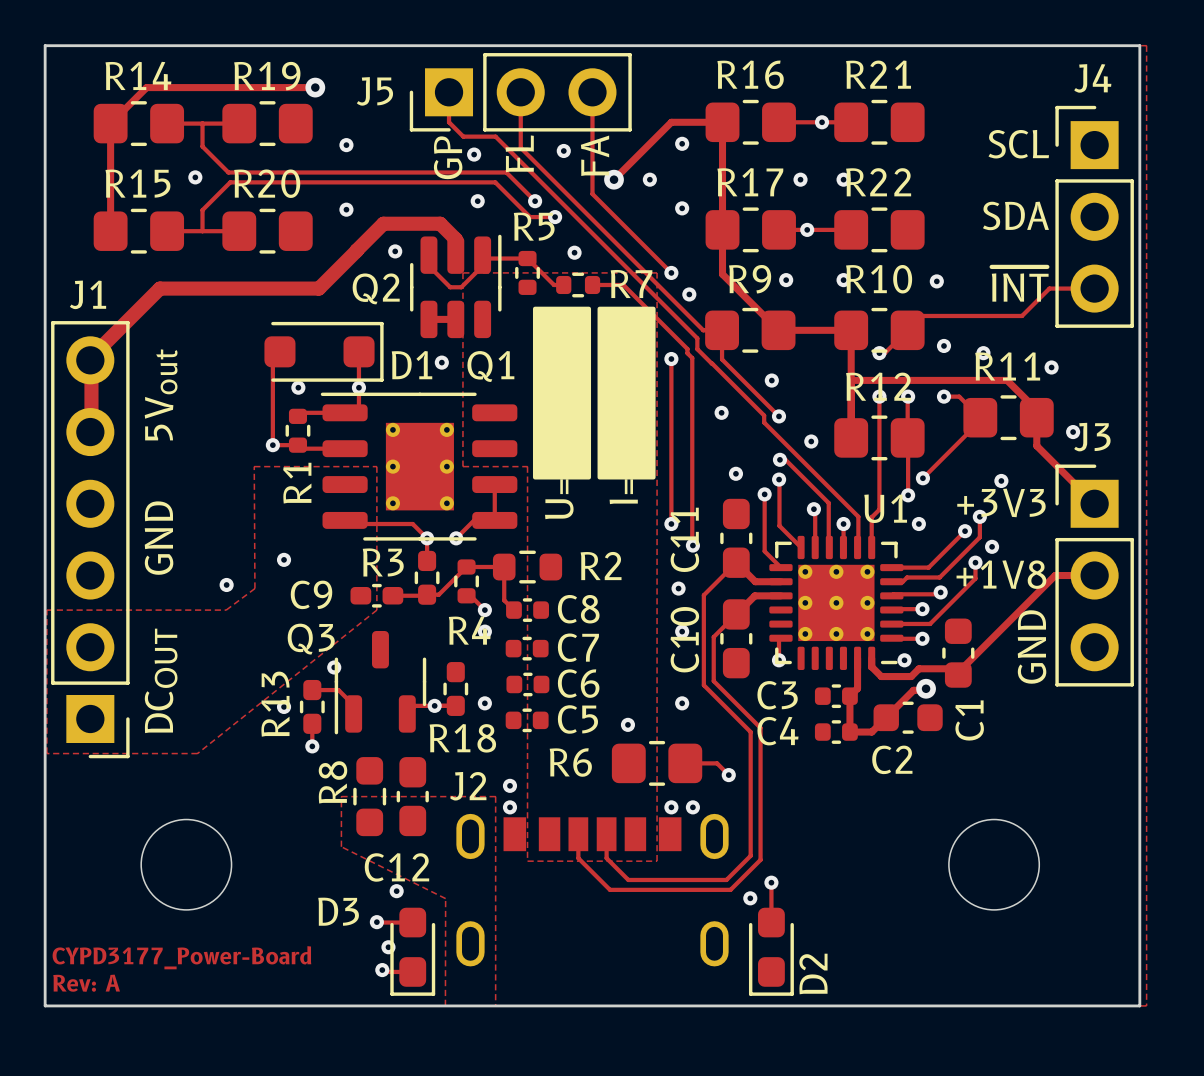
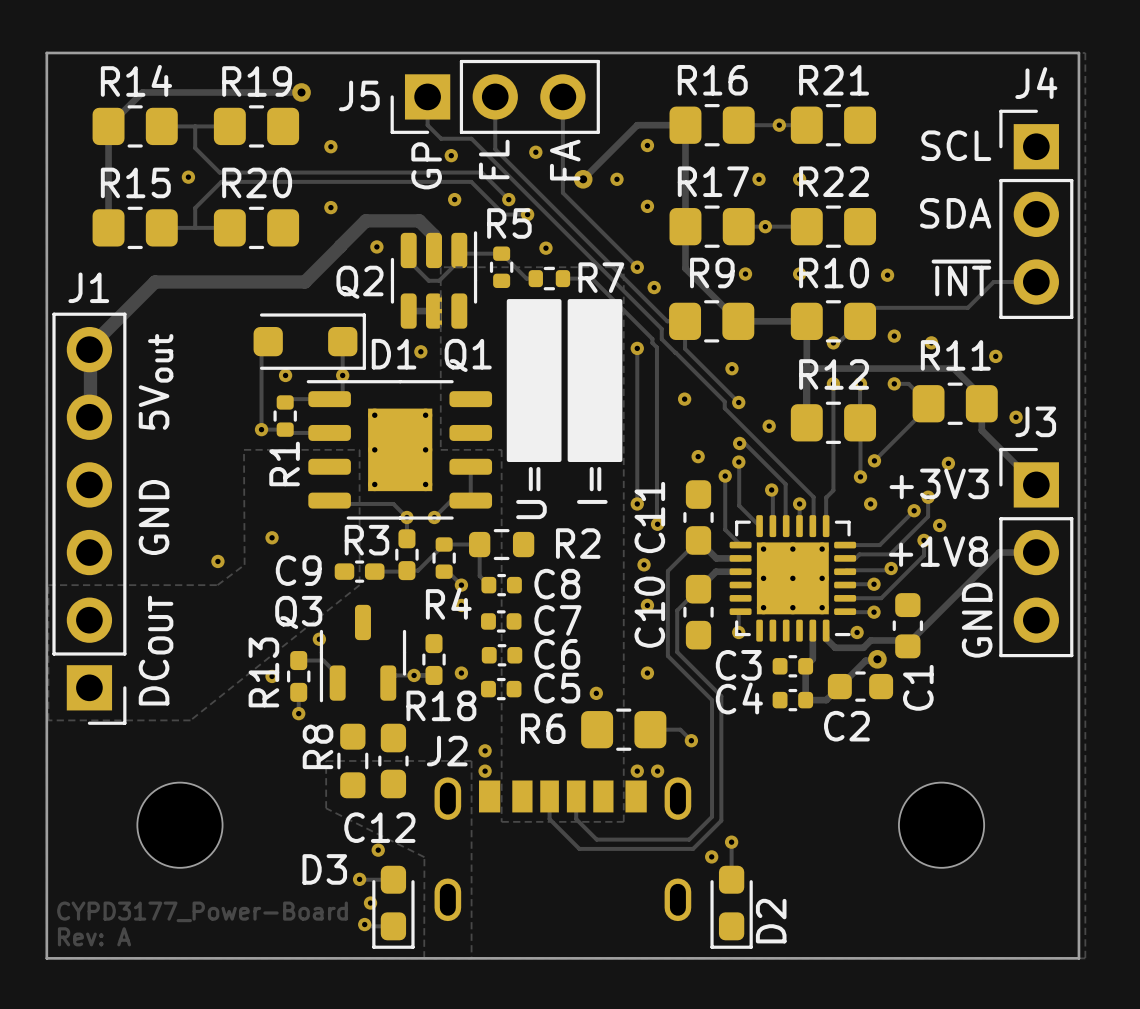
U1 name: U1 (885, 508) -> none

